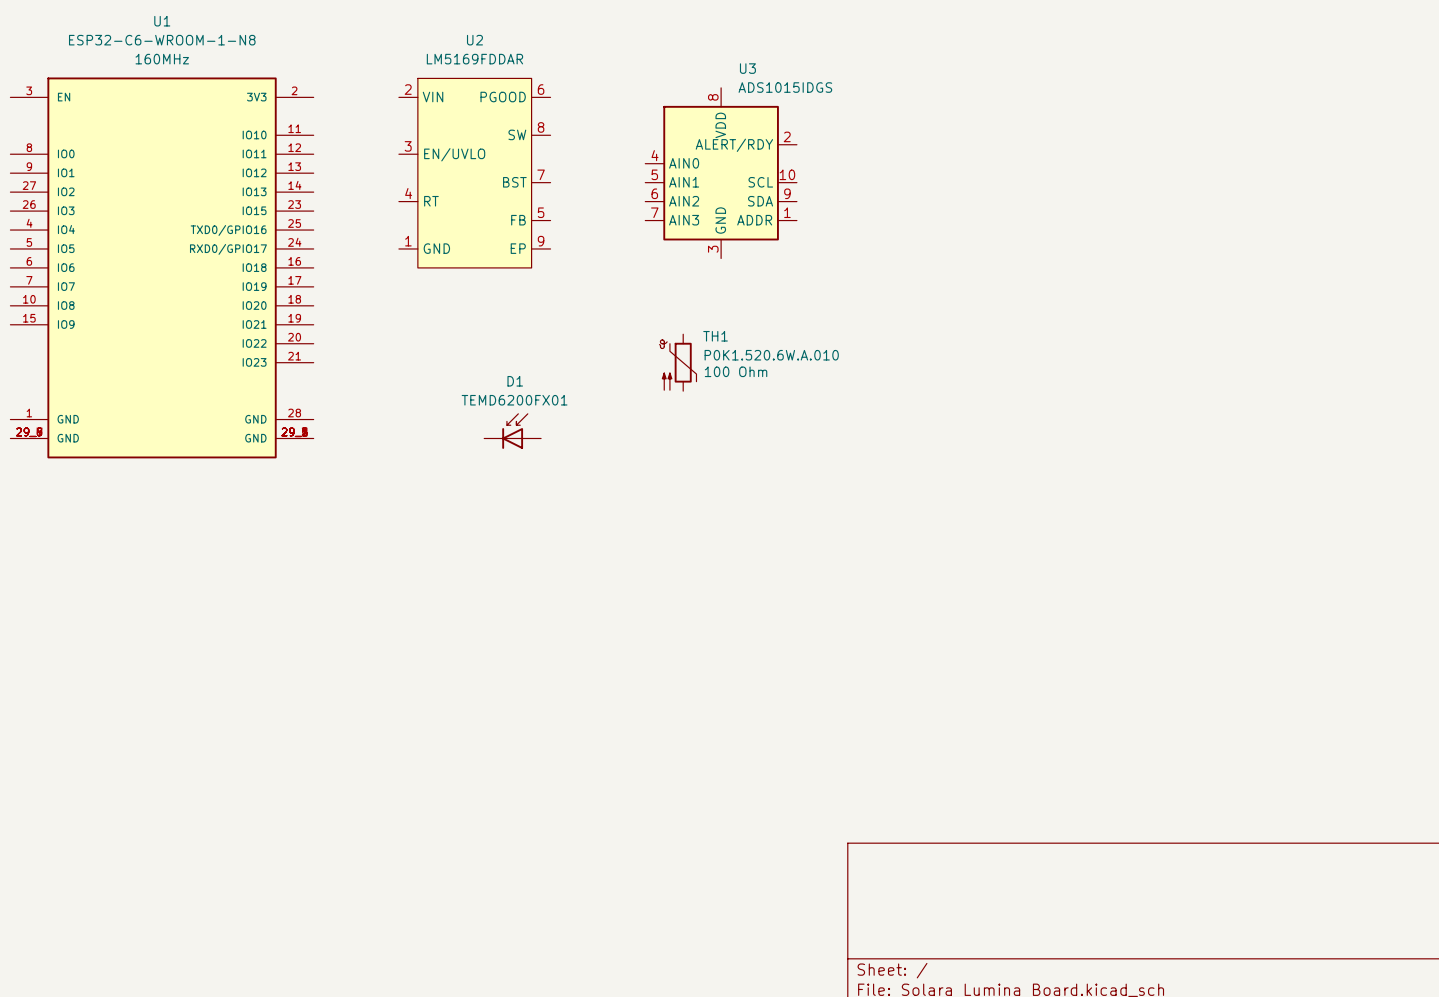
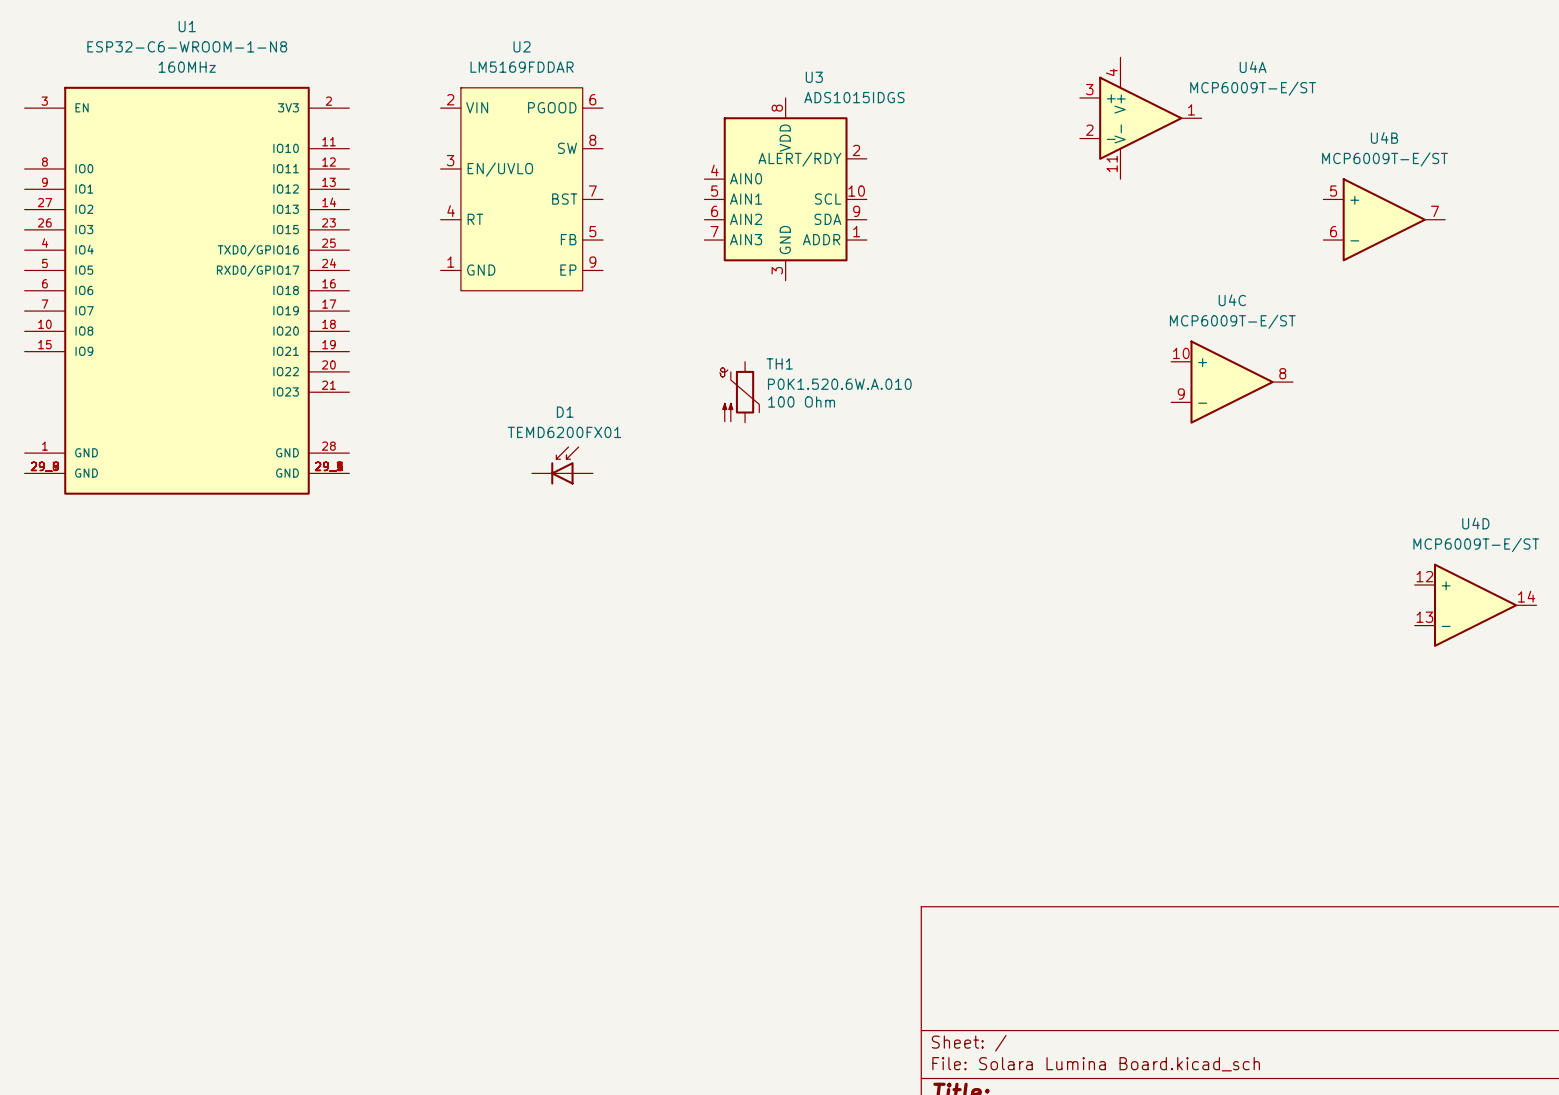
U4A: none -> MCP6009T-E/ST (1140, 118)
U4B: none -> MCP6009T-E/ST (1384, 219)
U4C: none -> MCP6009T-E/ST (1232, 382)
U4D: none -> MCP6009T-E/ST (1475, 605)

